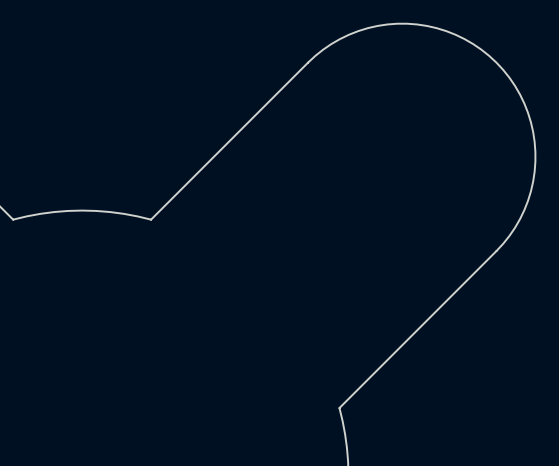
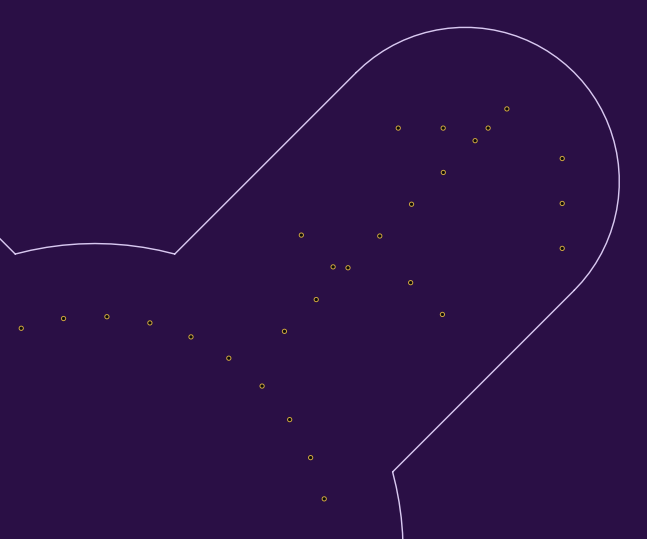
via: none -> (506, 108)
via: none -> (398, 128)
via: none -> (443, 128)
via: none -> (488, 128)
via: none -> (475, 140)
via: none -> (562, 158)
via: none -> (443, 172)
via: none -> (562, 203)
via: none -> (411, 204)
via: none -> (301, 235)
via: none -> (379, 236)
via: none -> (562, 248)
via: none -> (333, 266)
via: none -> (347, 267)
via: none -> (410, 282)
via: none -> (316, 299)
via: none -> (442, 314)
via: none -> (106, 316)
via: none -> (63, 318)
via: none -> (149, 322)
via: none -> (21, 328)
via: none -> (284, 331)
via: none -> (190, 336)
via: none -> (228, 358)
via: none -> (262, 386)
via: none -> (289, 419)
via: none -> (310, 457)
via: none -> (324, 498)

